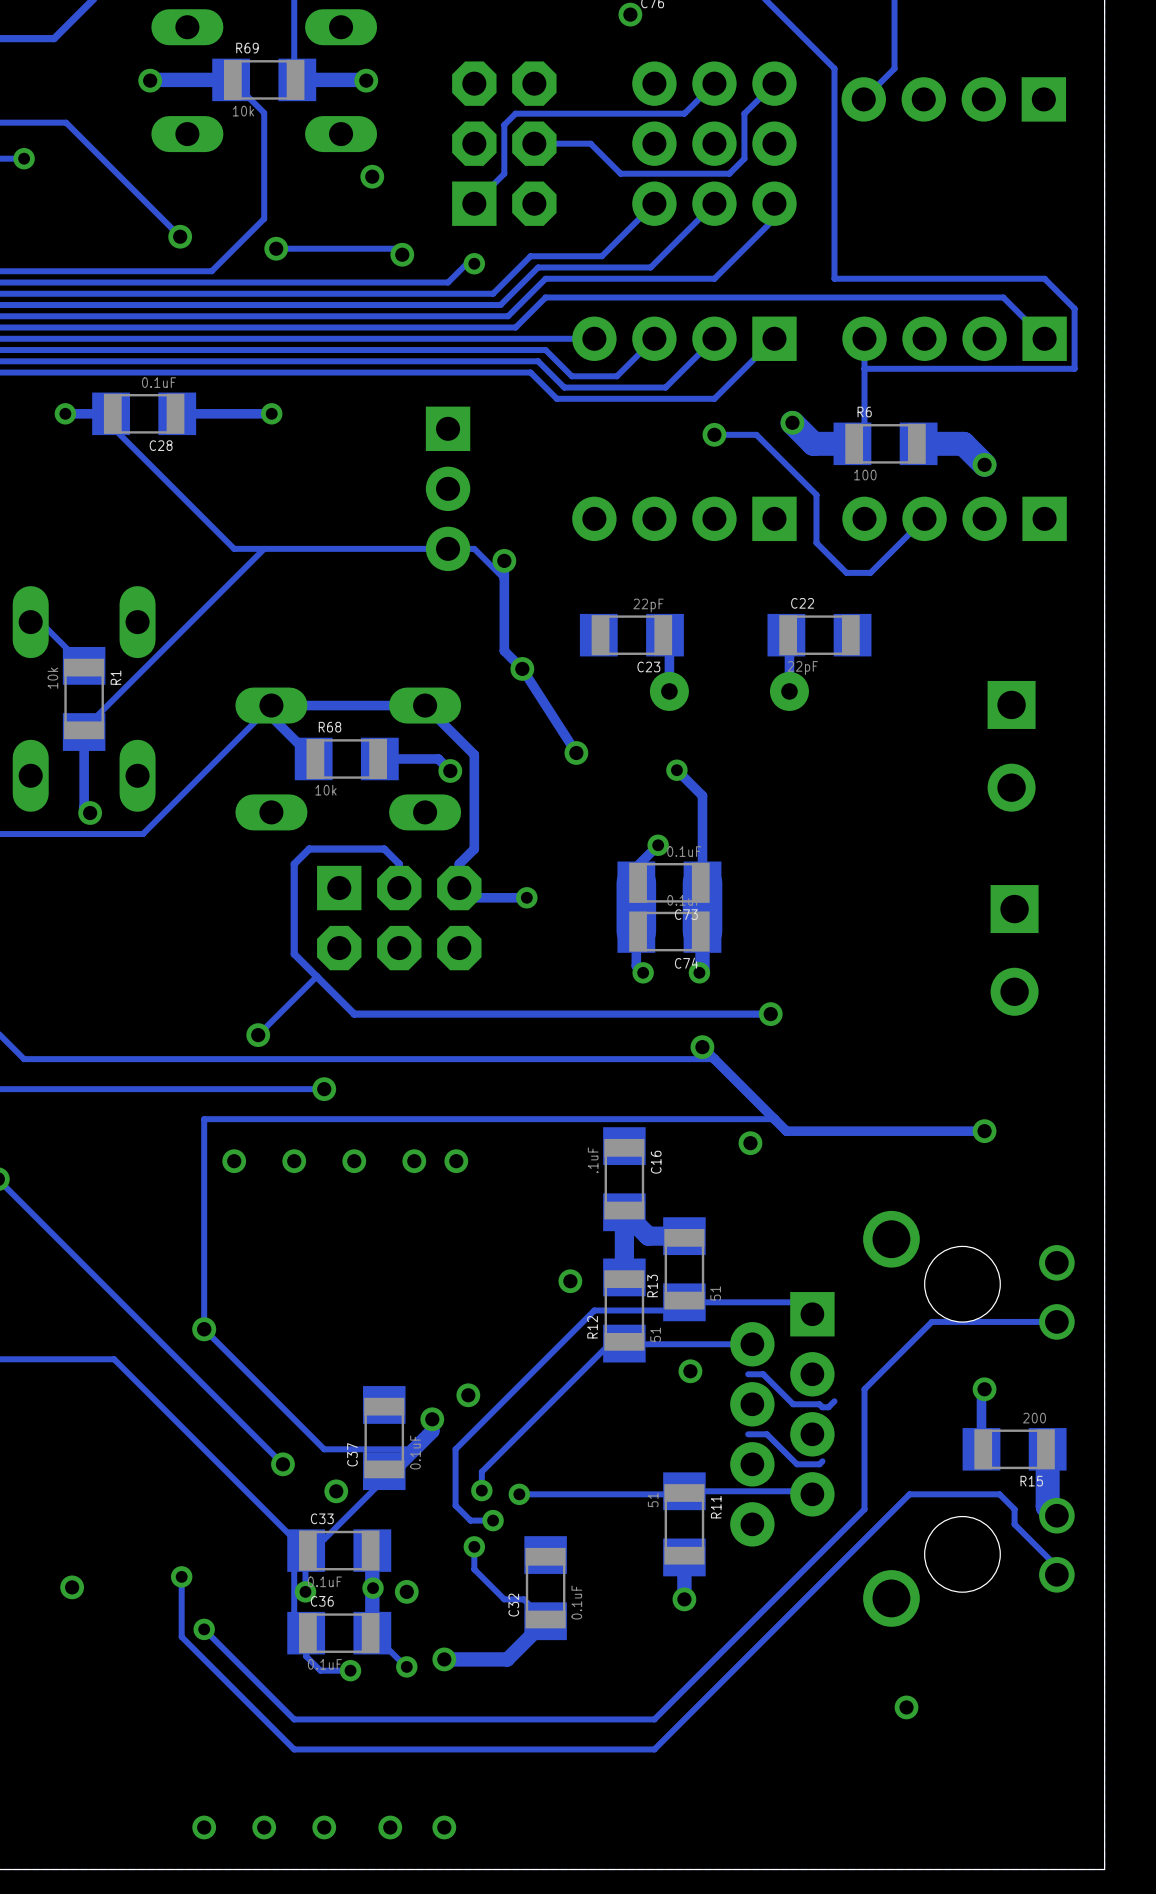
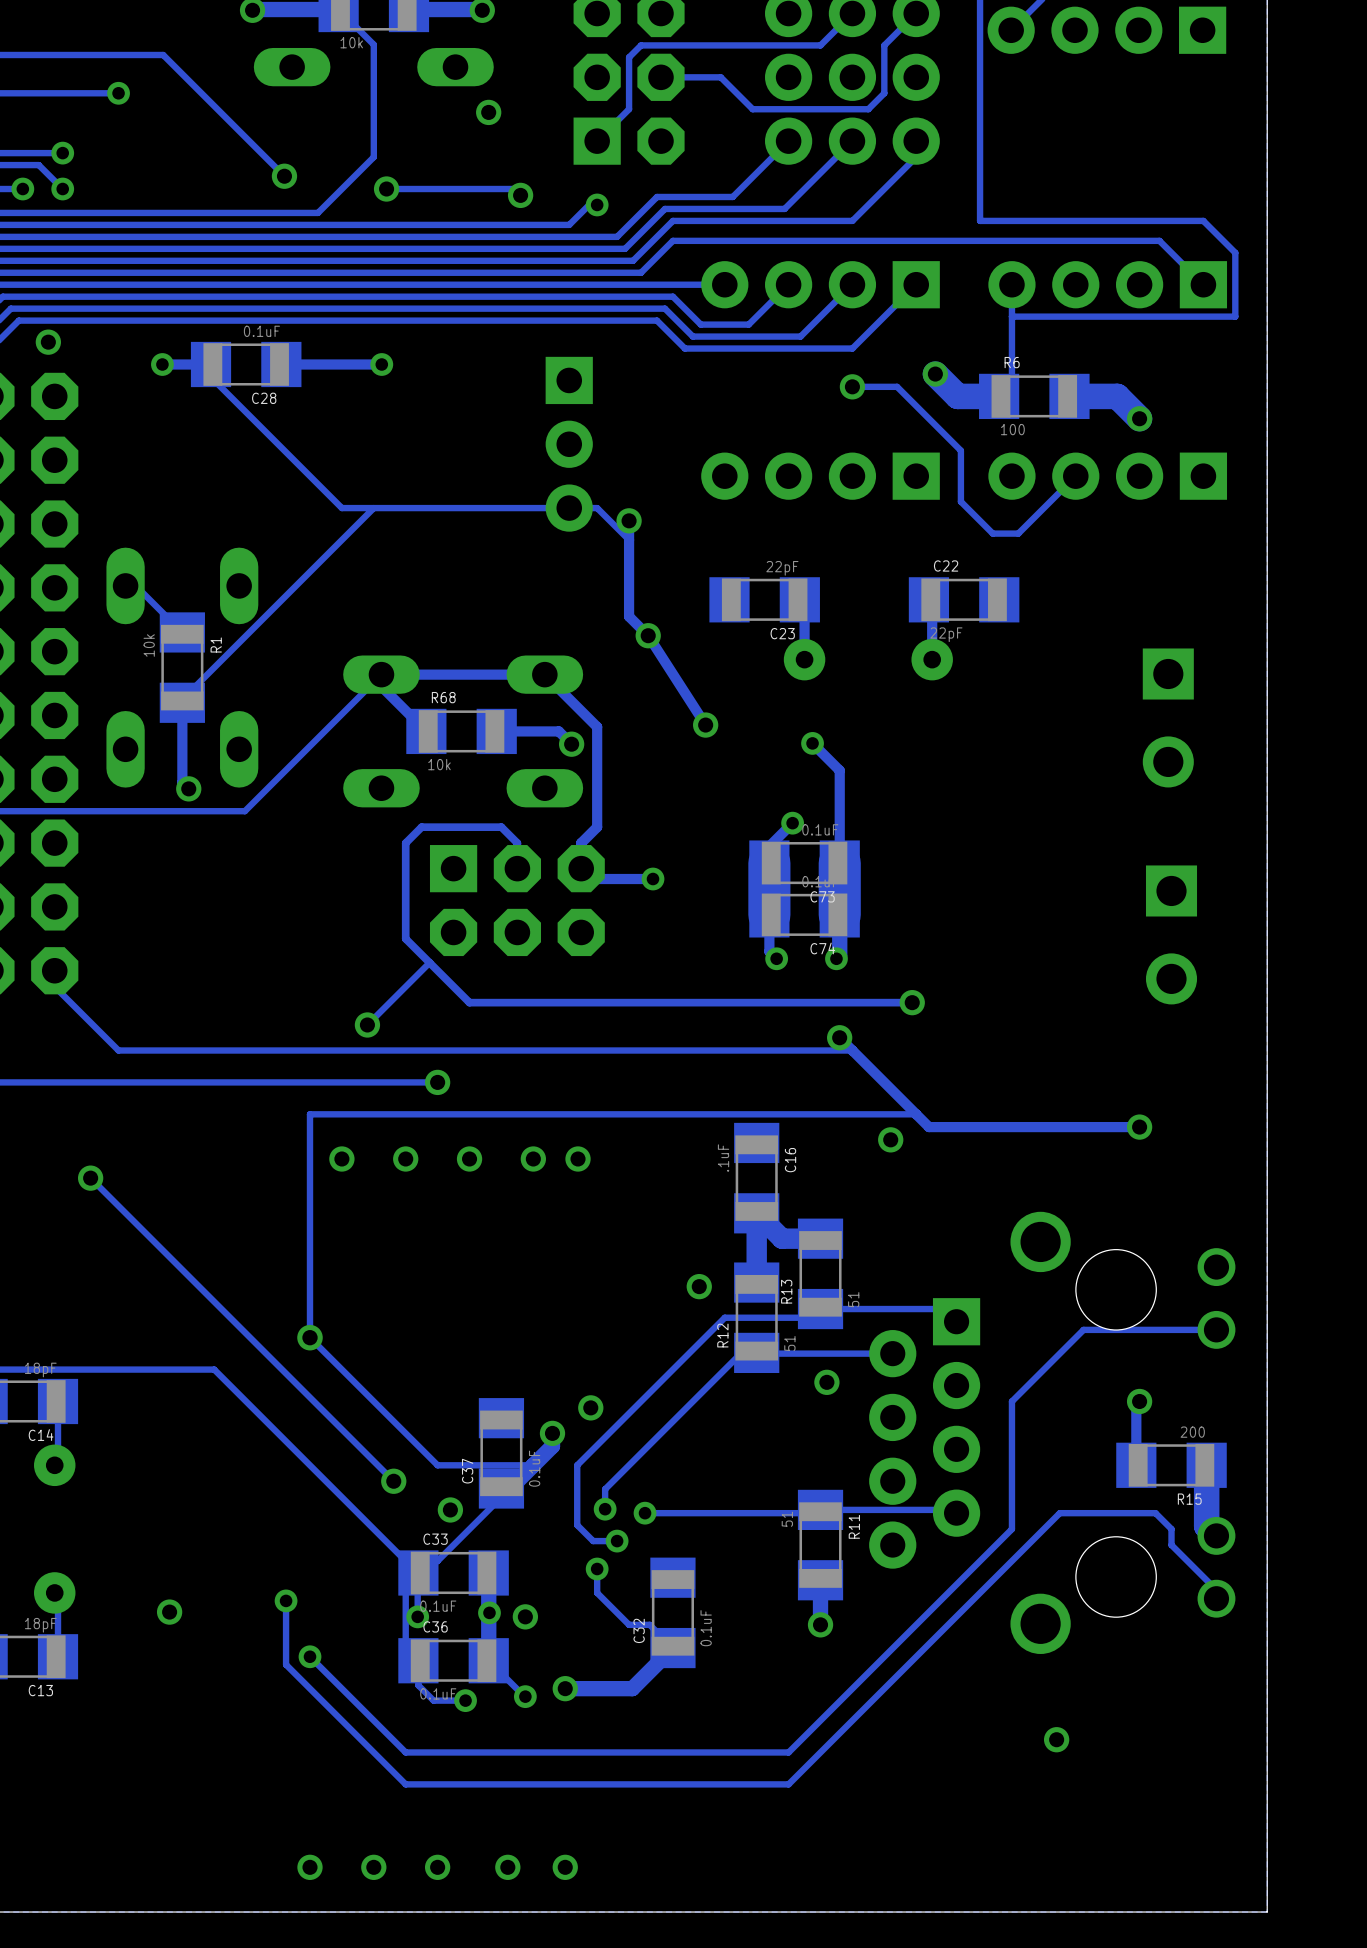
track: (748, 1374) (763, 1374) (793, 1404) (819, 1404) (822, 1407) (828, 1407) (834, 1401) -> none
track: (748, 1434) (766, 1434) (796, 1464) (819, 1464) (822, 1461) -> none

